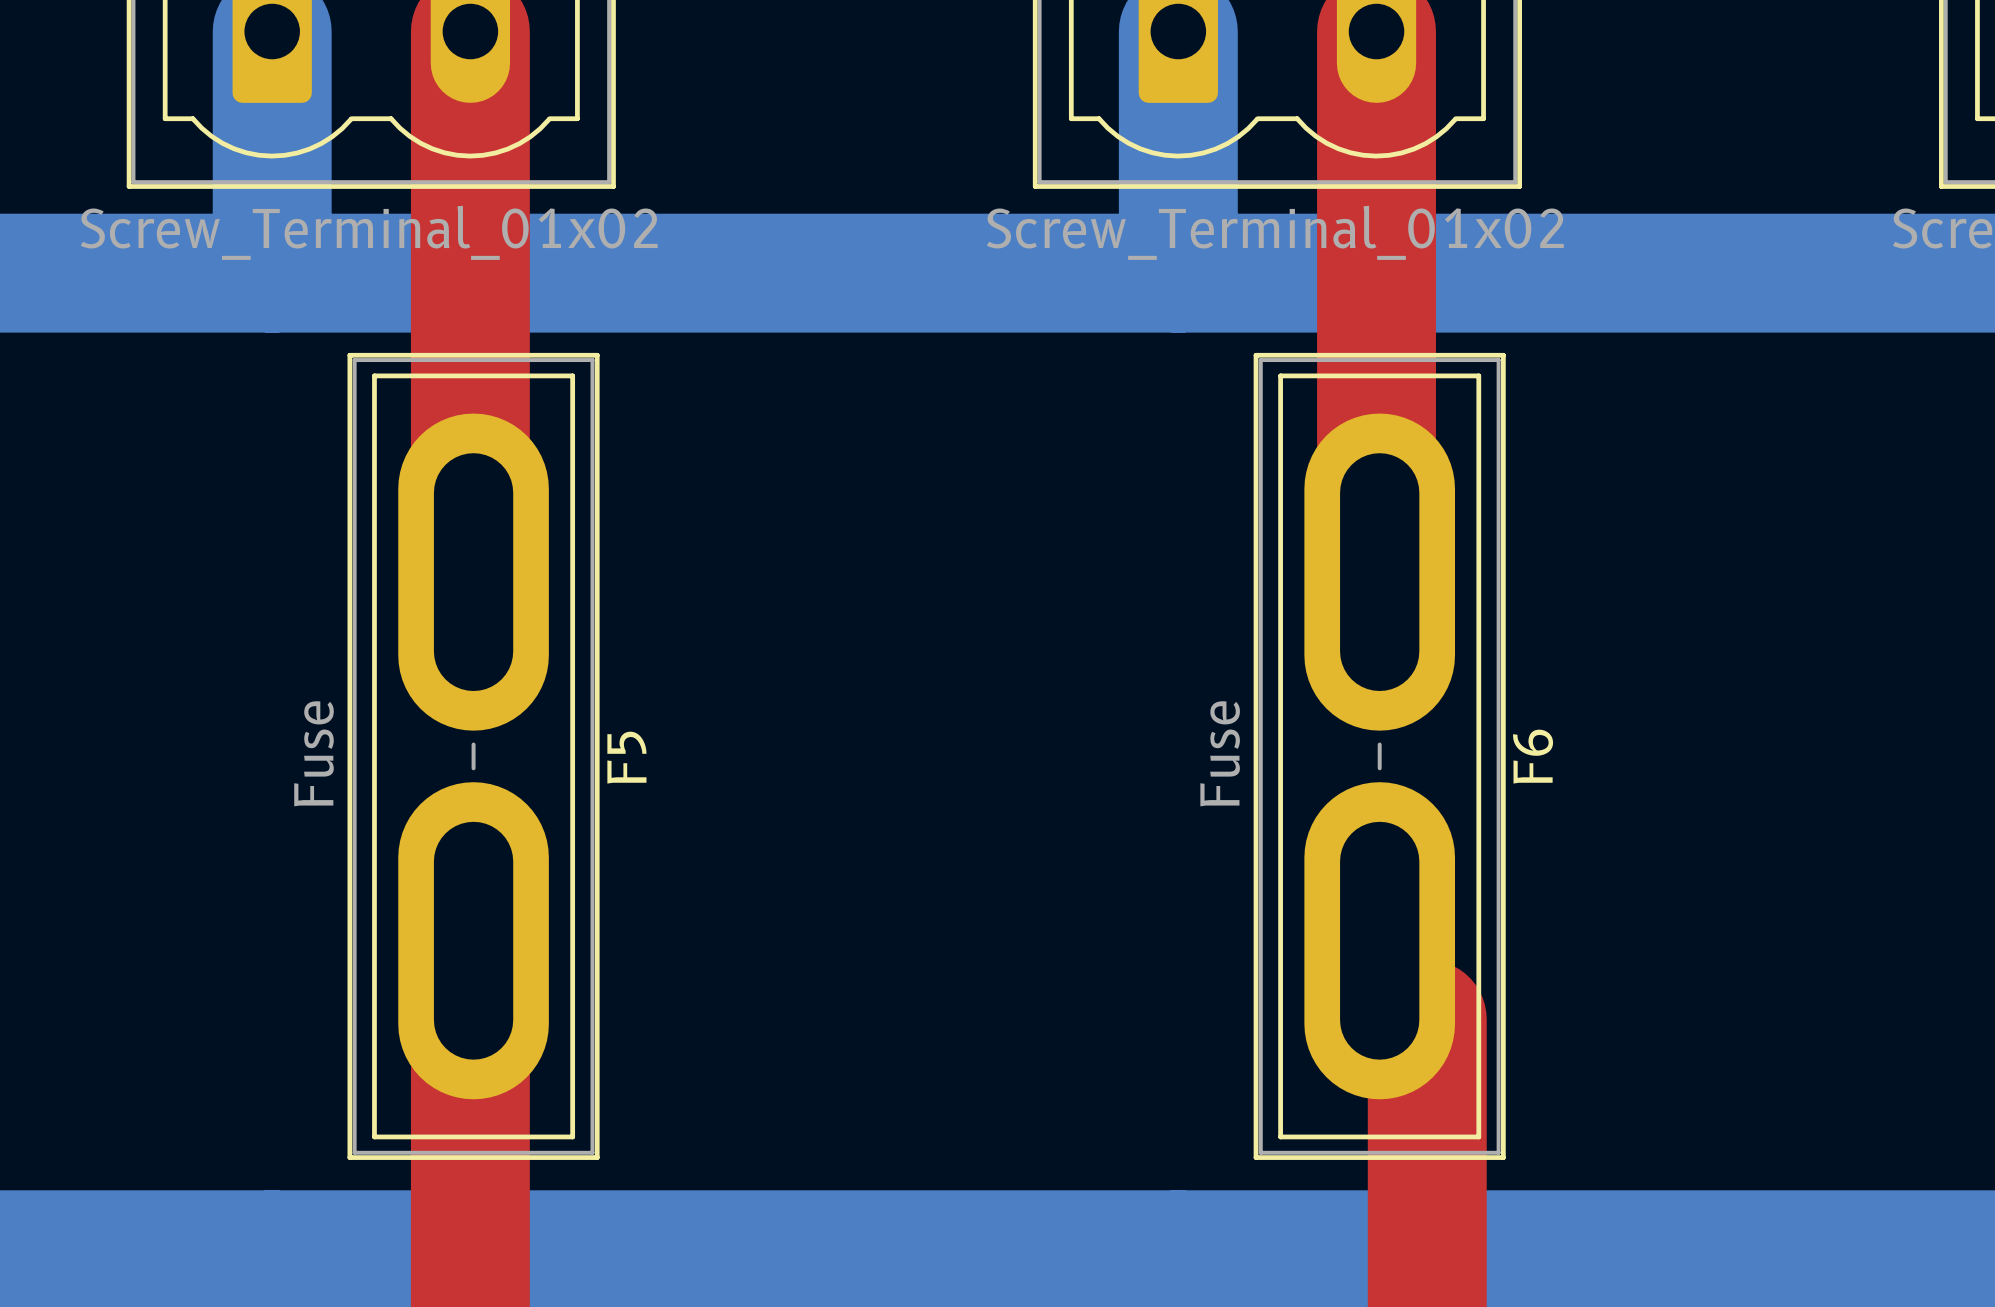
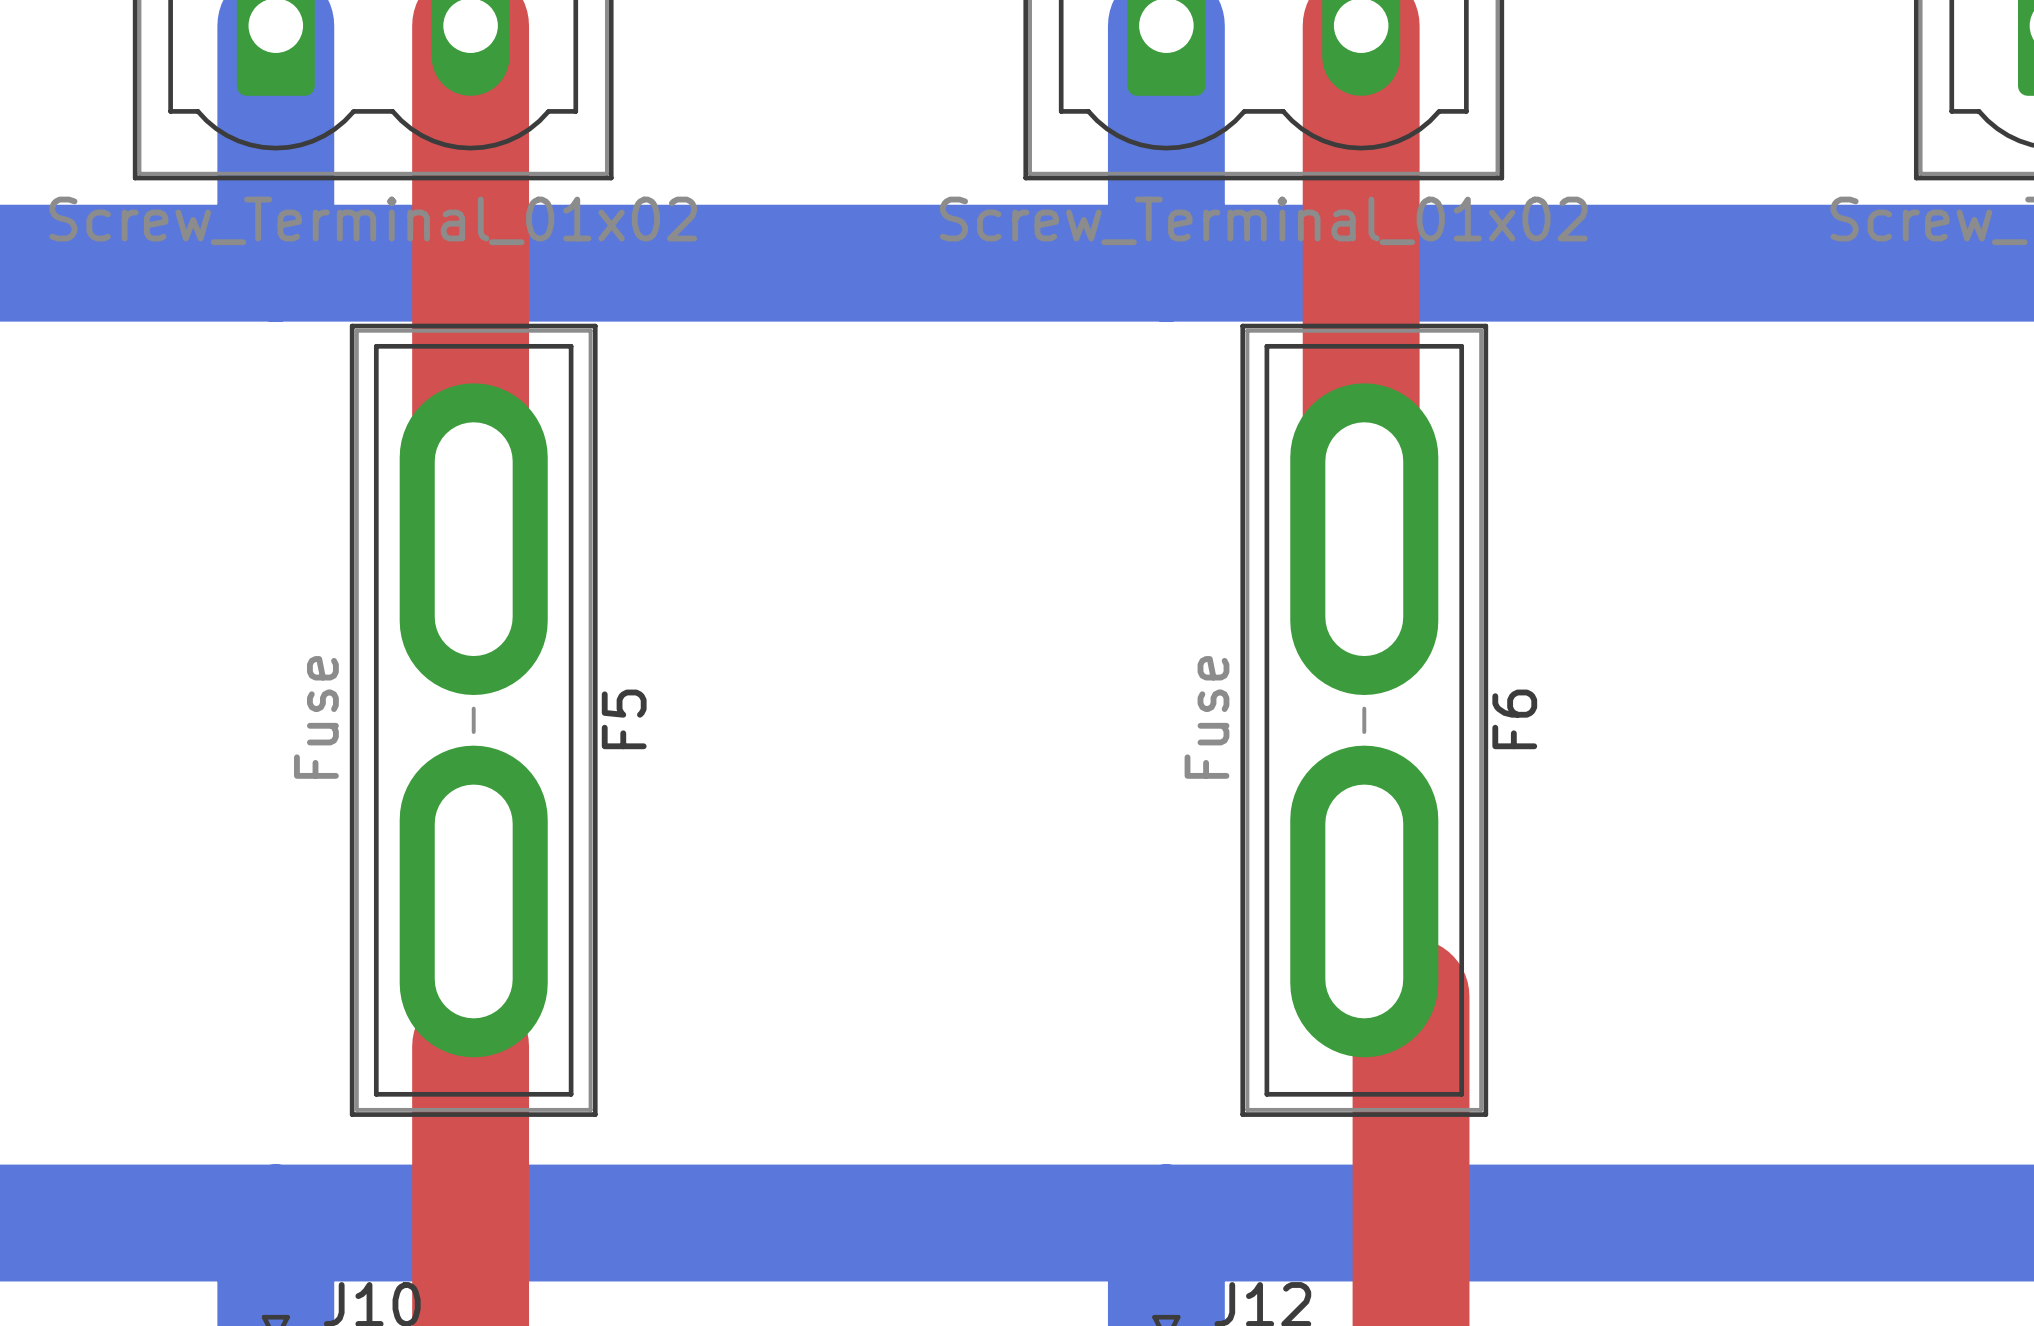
F5 position: (473, 756) -> (473, 720)
F6 position: (1379, 756) -> (1364, 720)

